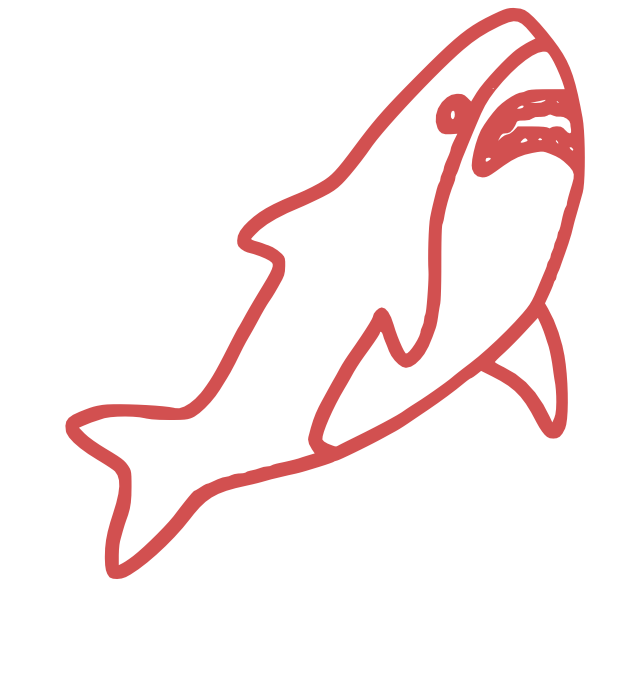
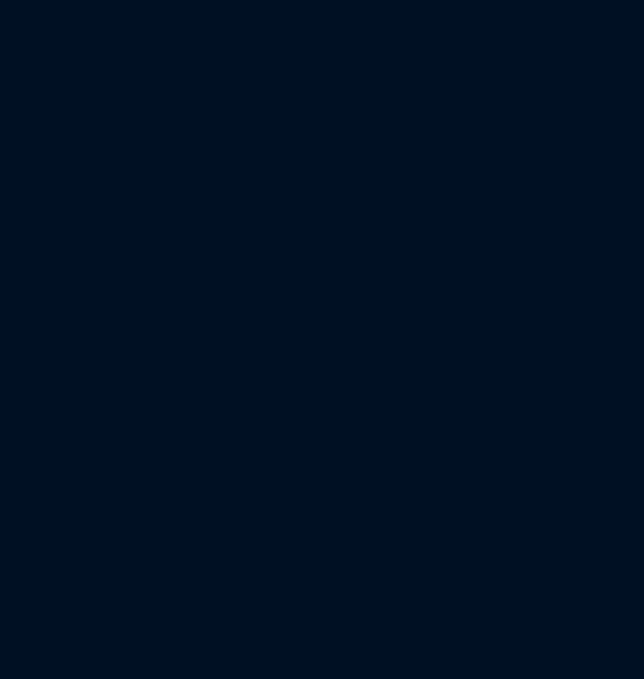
drawing: [65, 7, 585, 580] -> none

